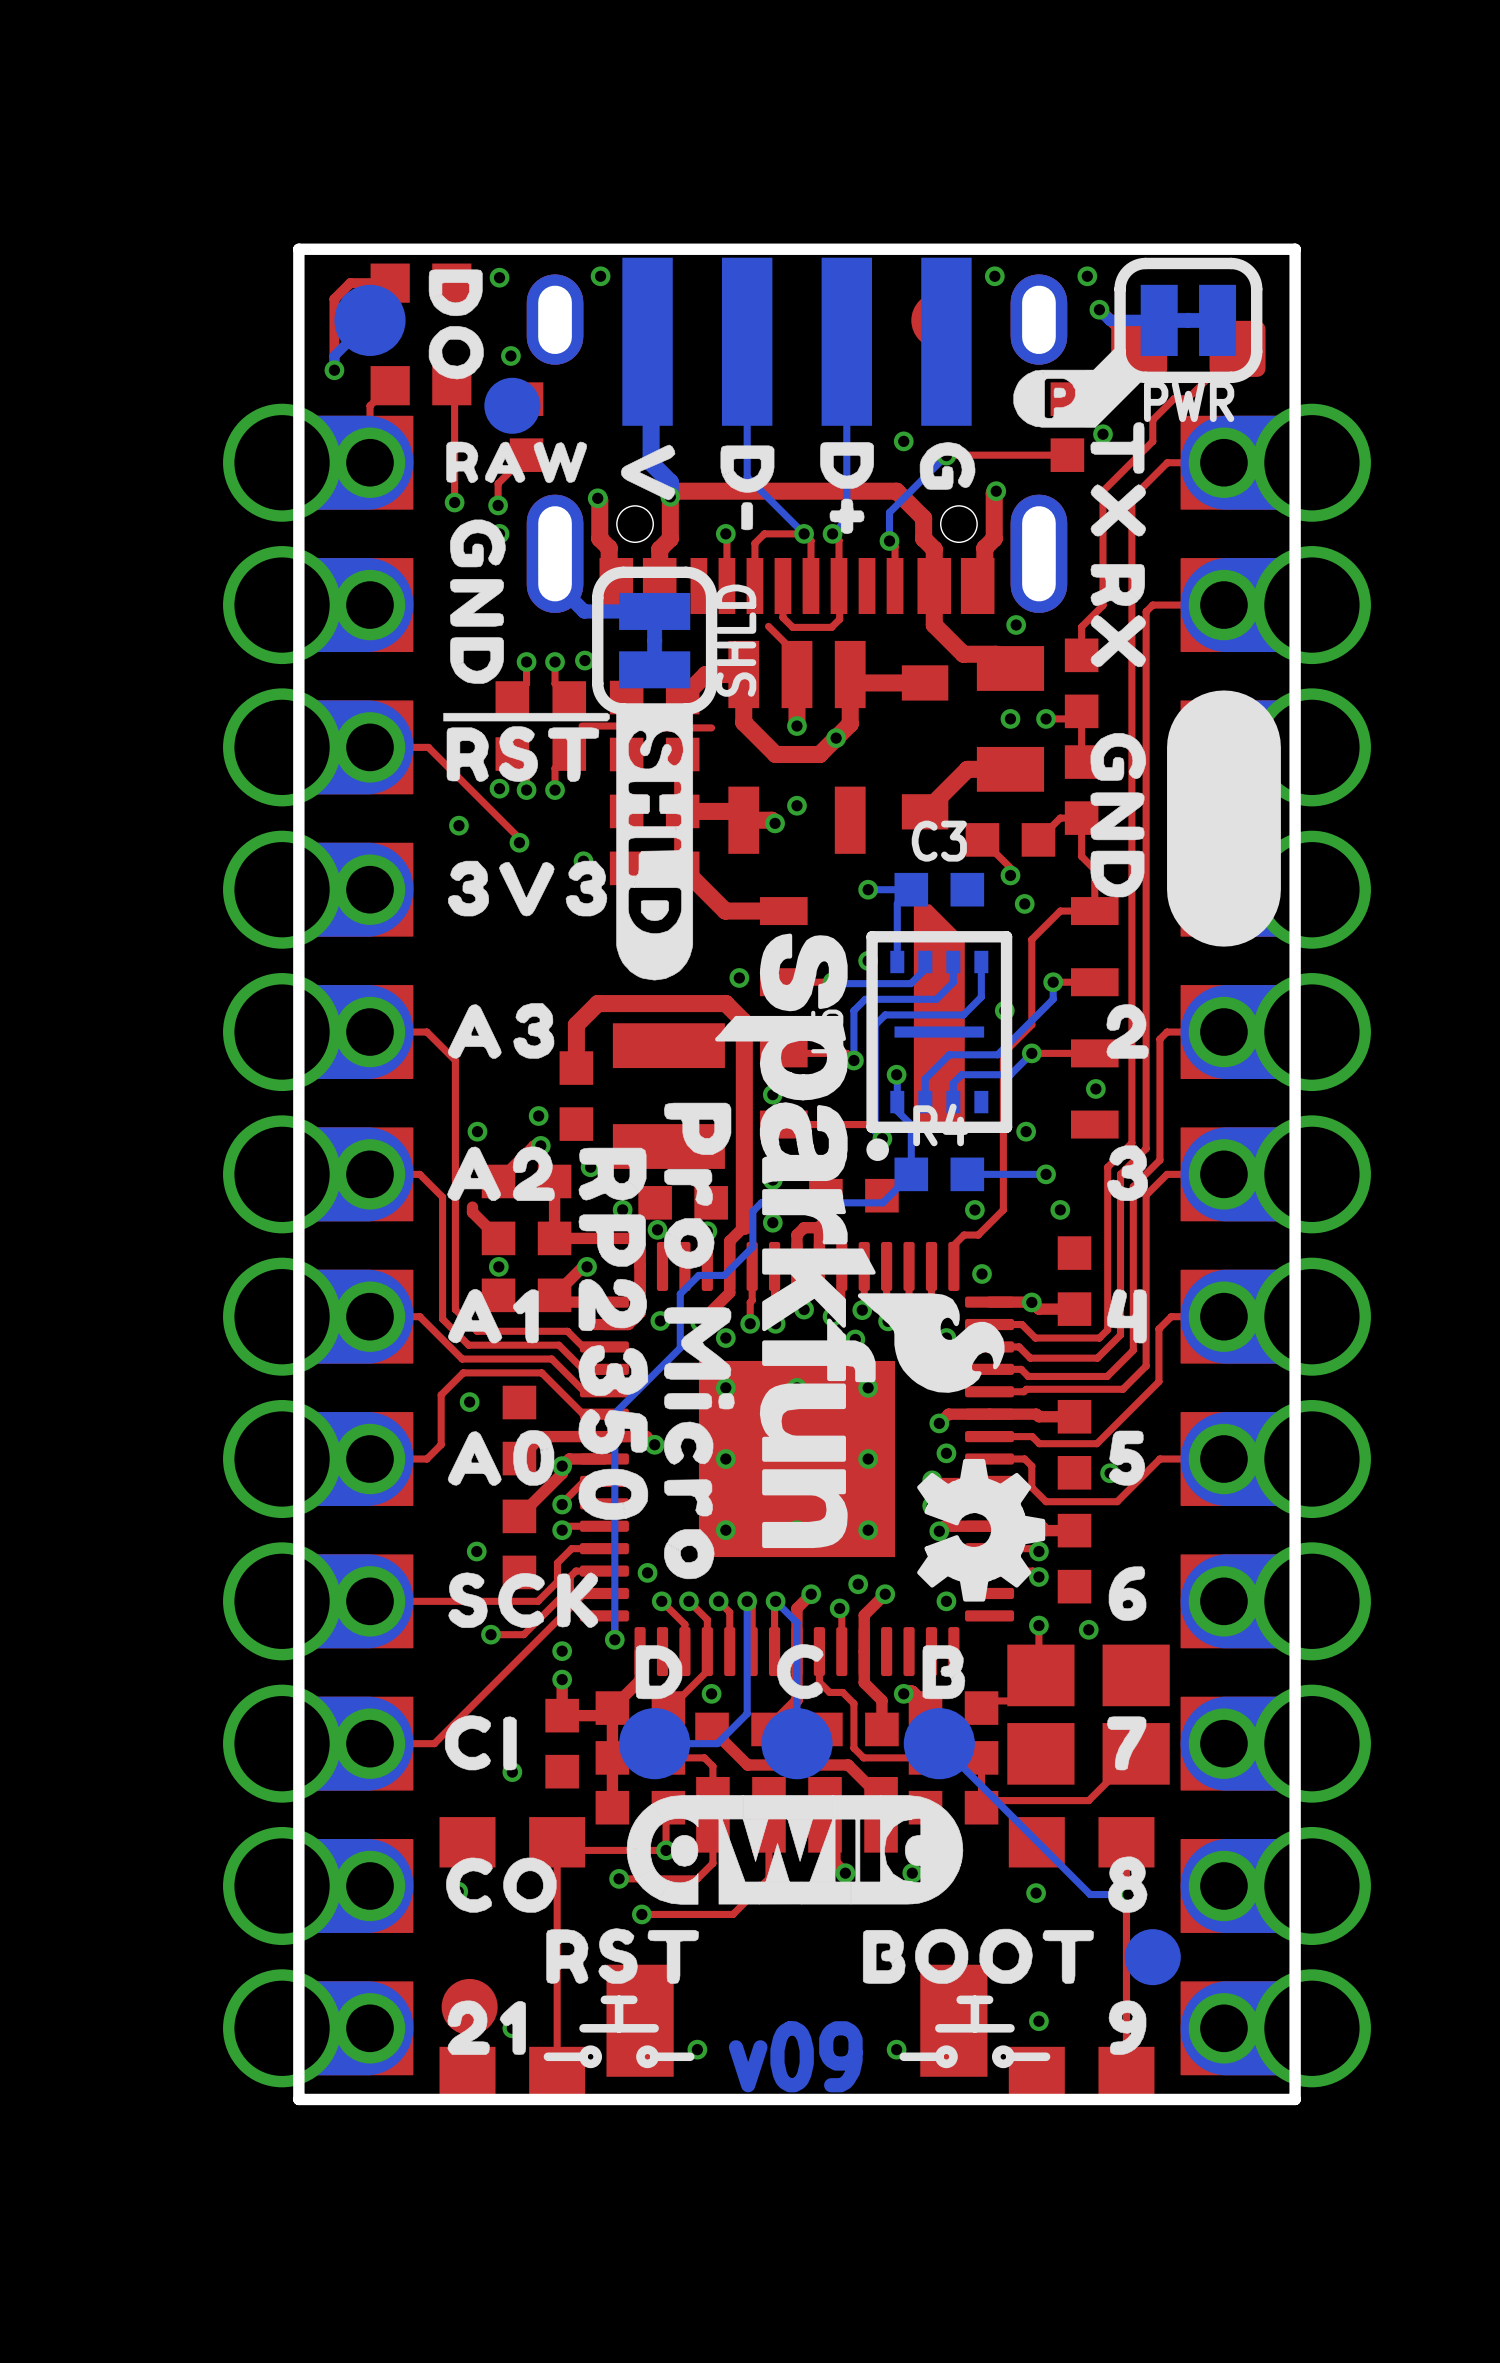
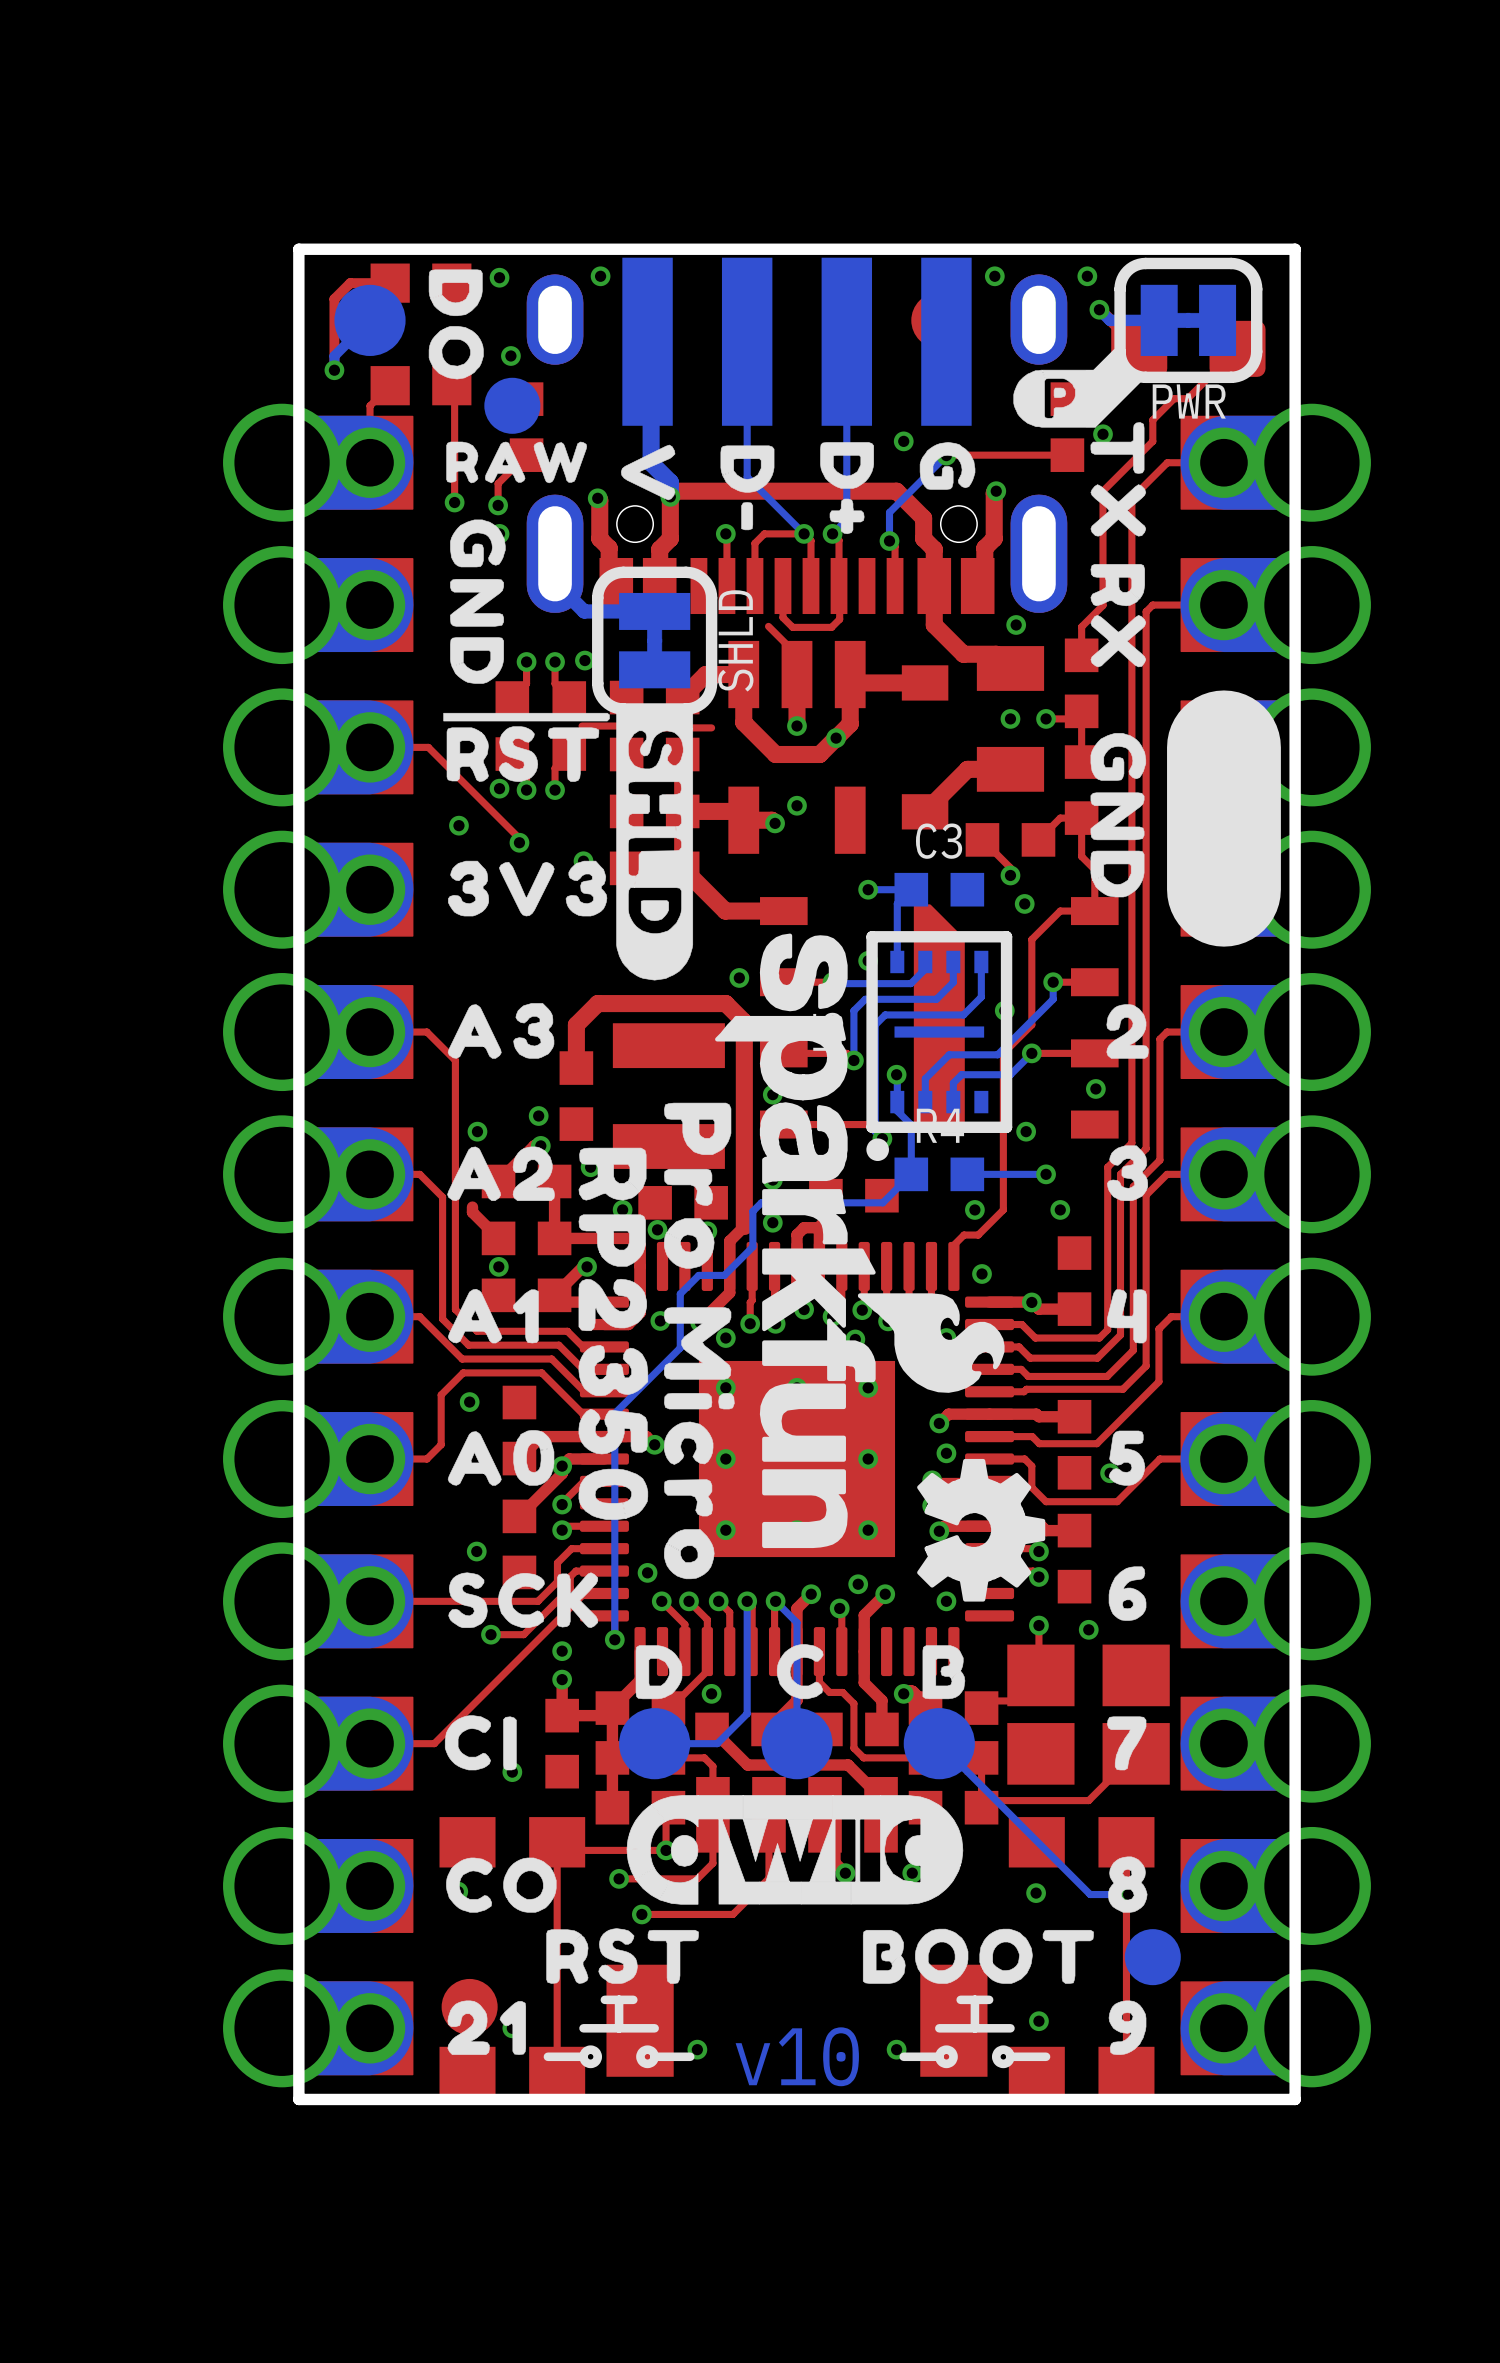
text: v09 (795, 2056) -> v10 (797, 2056)

